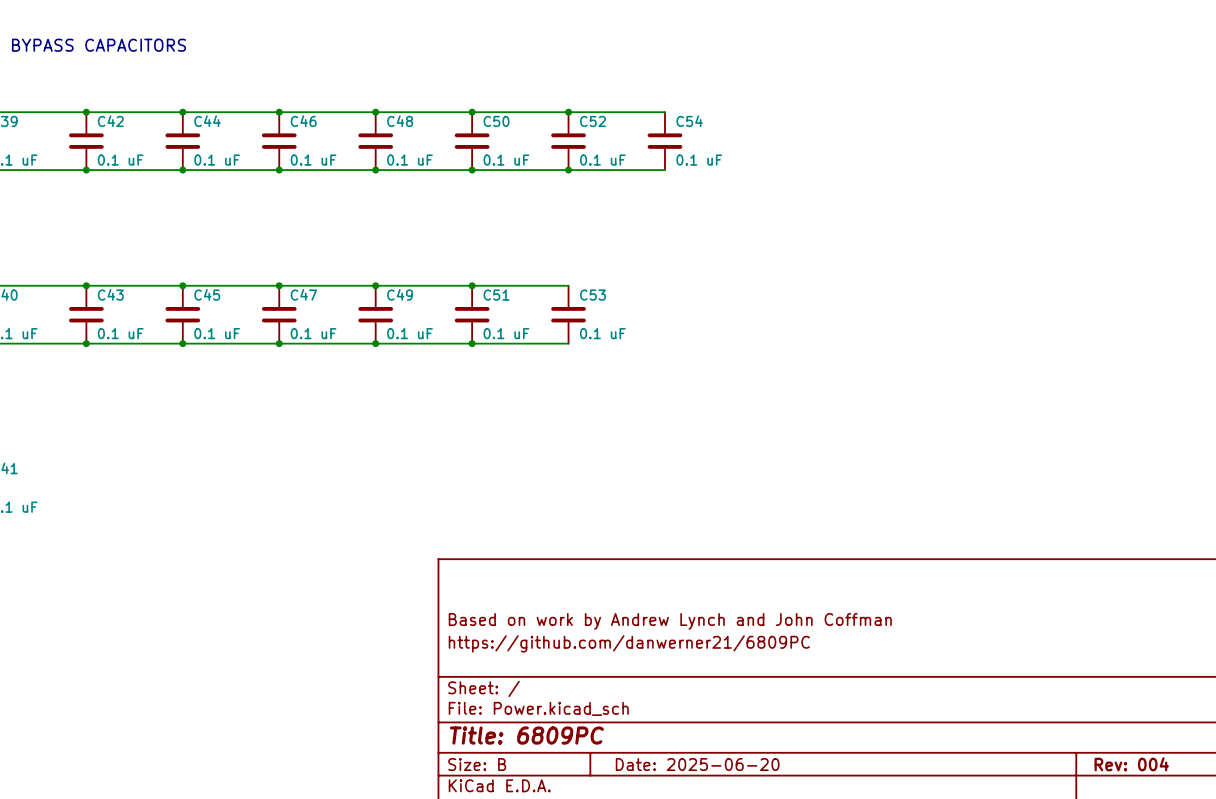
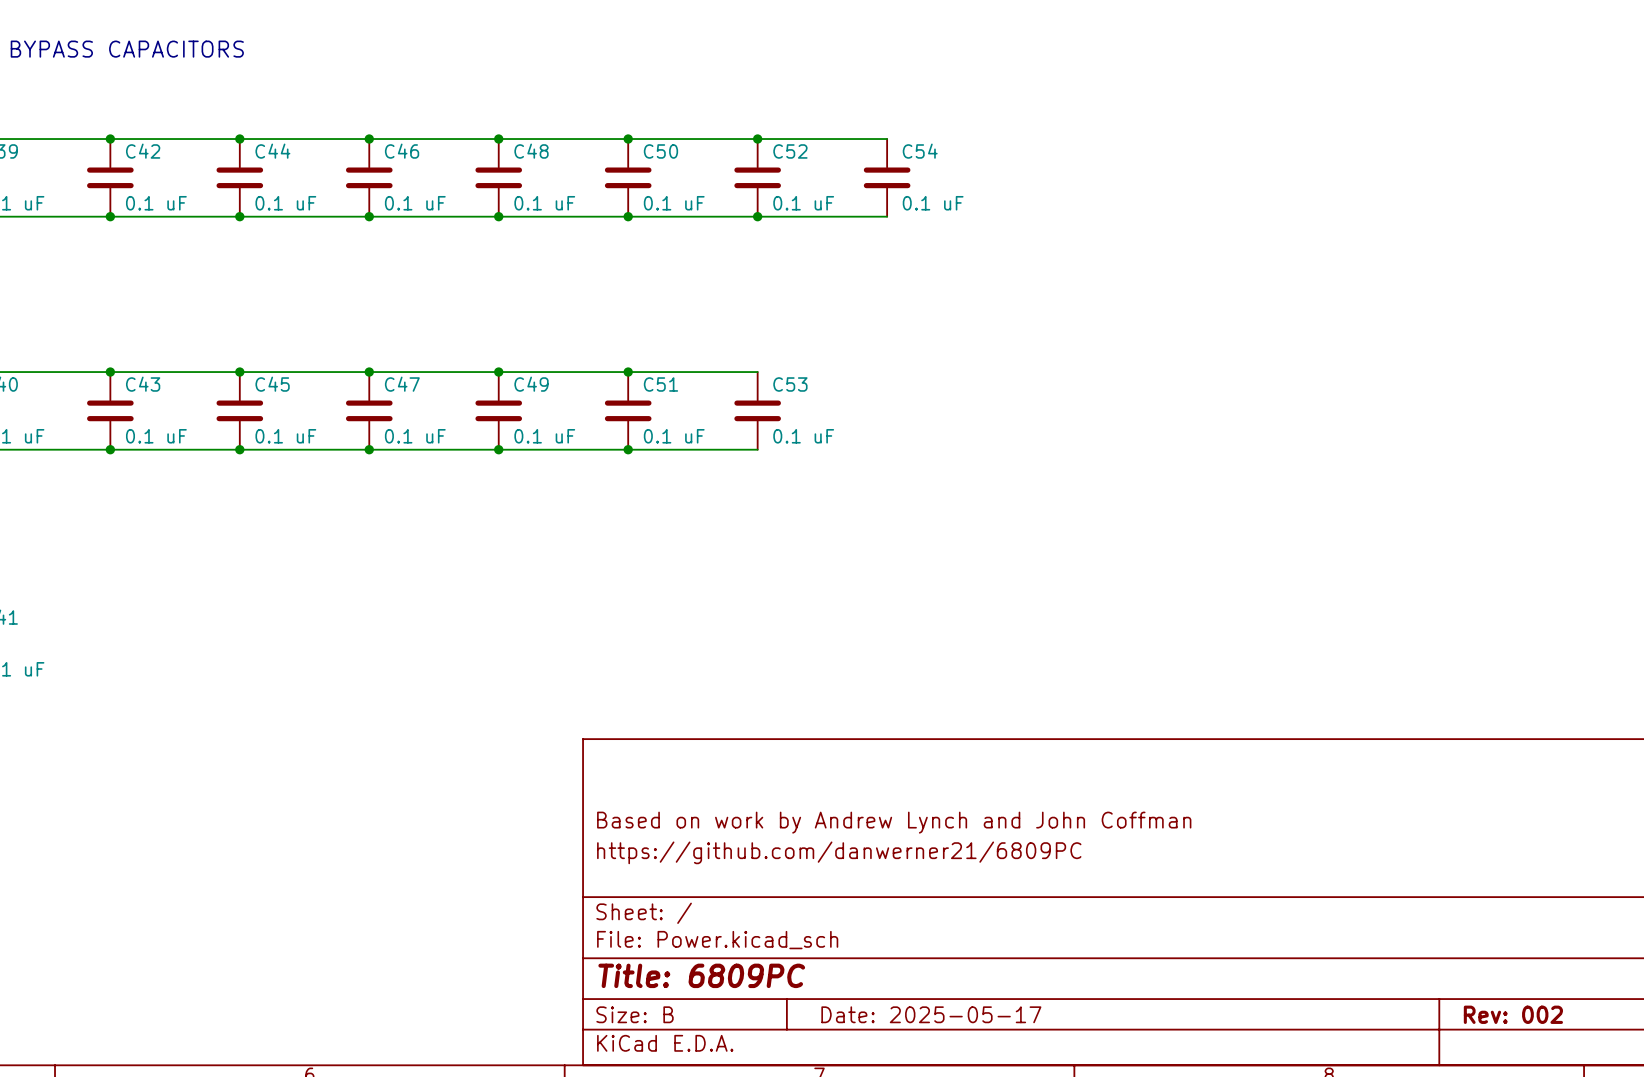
title block: Date: 2025-06-20 (697, 764) -> Date: 2025-05-17 (931, 1014)
title block: Rev: 004 (1131, 764) -> Rev: 002 (1513, 1014)

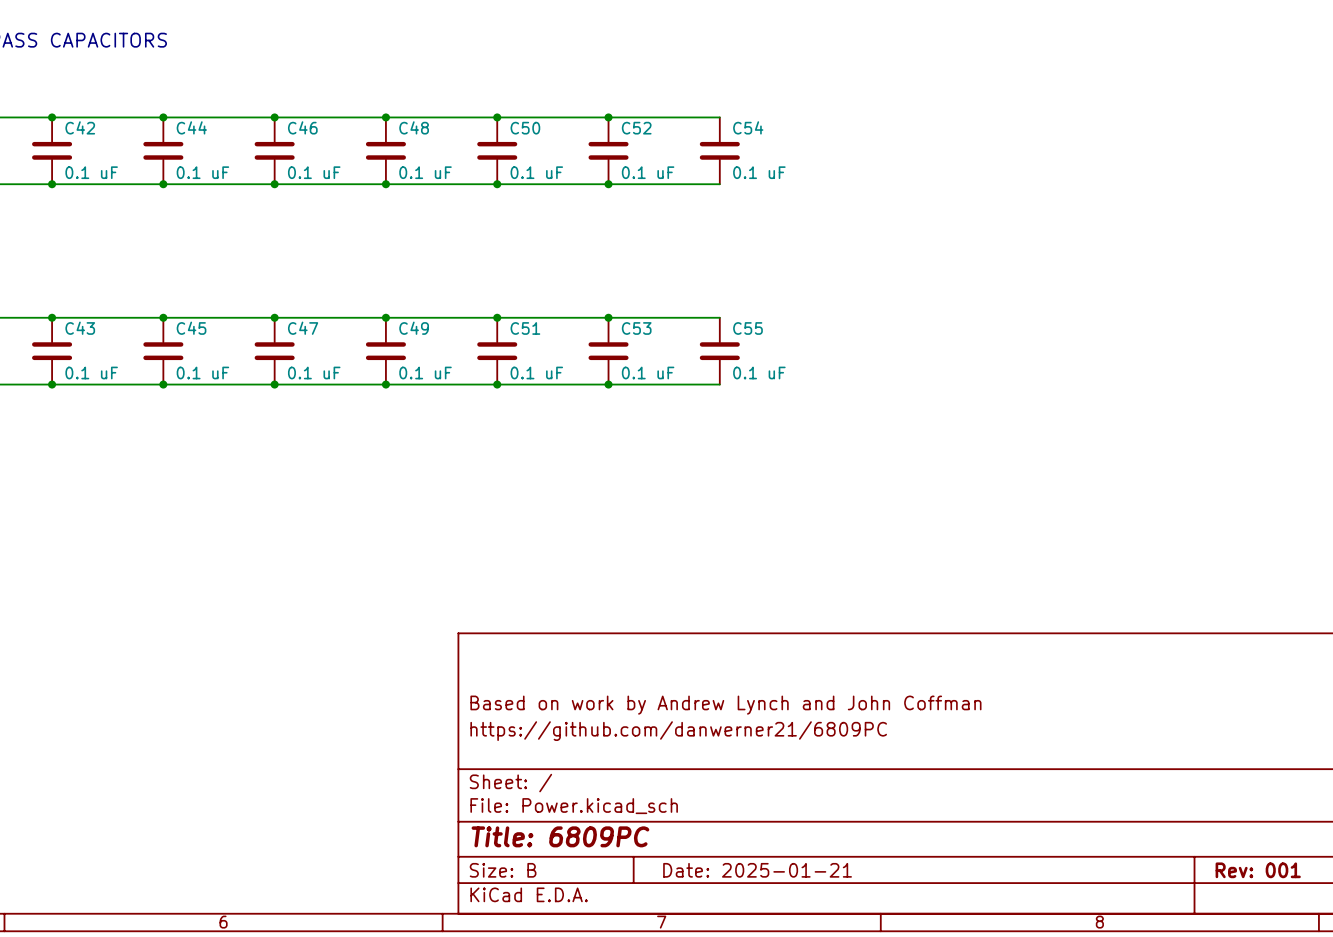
wire: none -> (608, 317) (719, 317)
junction: none -> (608, 317)
C55: none -> 0.1 uF (719, 351)
wire: none -> (608, 384) (719, 384)
junction: none -> (608, 384)
title block: Date: 2025-05-17 (931, 1014) -> Date: 2025-01-21 (757, 870)
title block: Rev: 002 (1513, 1014) -> Rev: 001 (1258, 870)

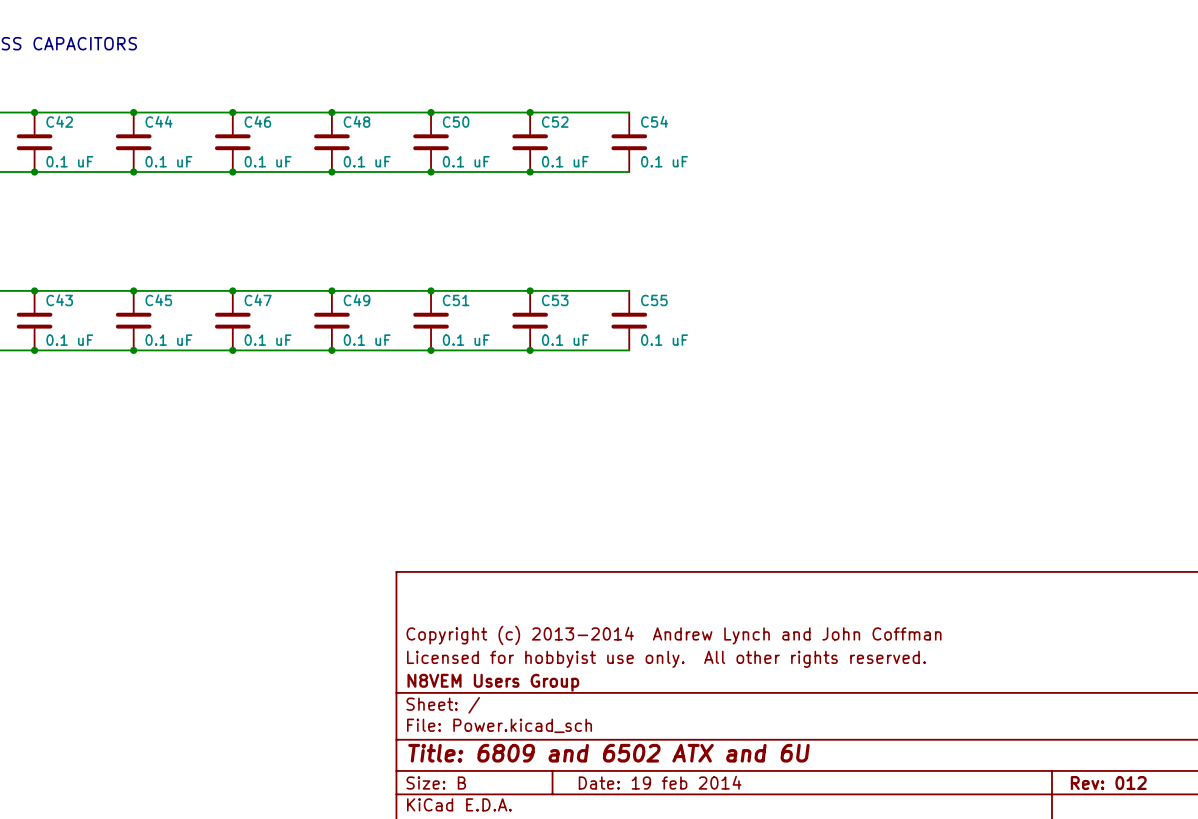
title block: Based on work by Andrew Lynch and John Coffman (725, 705) -> Copyright (c) 2013-2014 Andrew Lynch and John Coffman (674, 635)
title block: https://github.com/danwerner21/6809PC (678, 731) -> Licensed for hobbyist use only. All other rights reserved. (666, 659)
title block: none -> N8VEM Users Group (493, 682)
title block: Title: 6809PC (560, 836) -> Title: 6809 and 6502 ATX and 6U (608, 753)
title block: Date: 2025-01-21 (757, 870) -> Date: 19 feb 2014 (660, 782)
title block: Rev: 001 (1258, 870) -> Rev: 012 (1108, 783)

